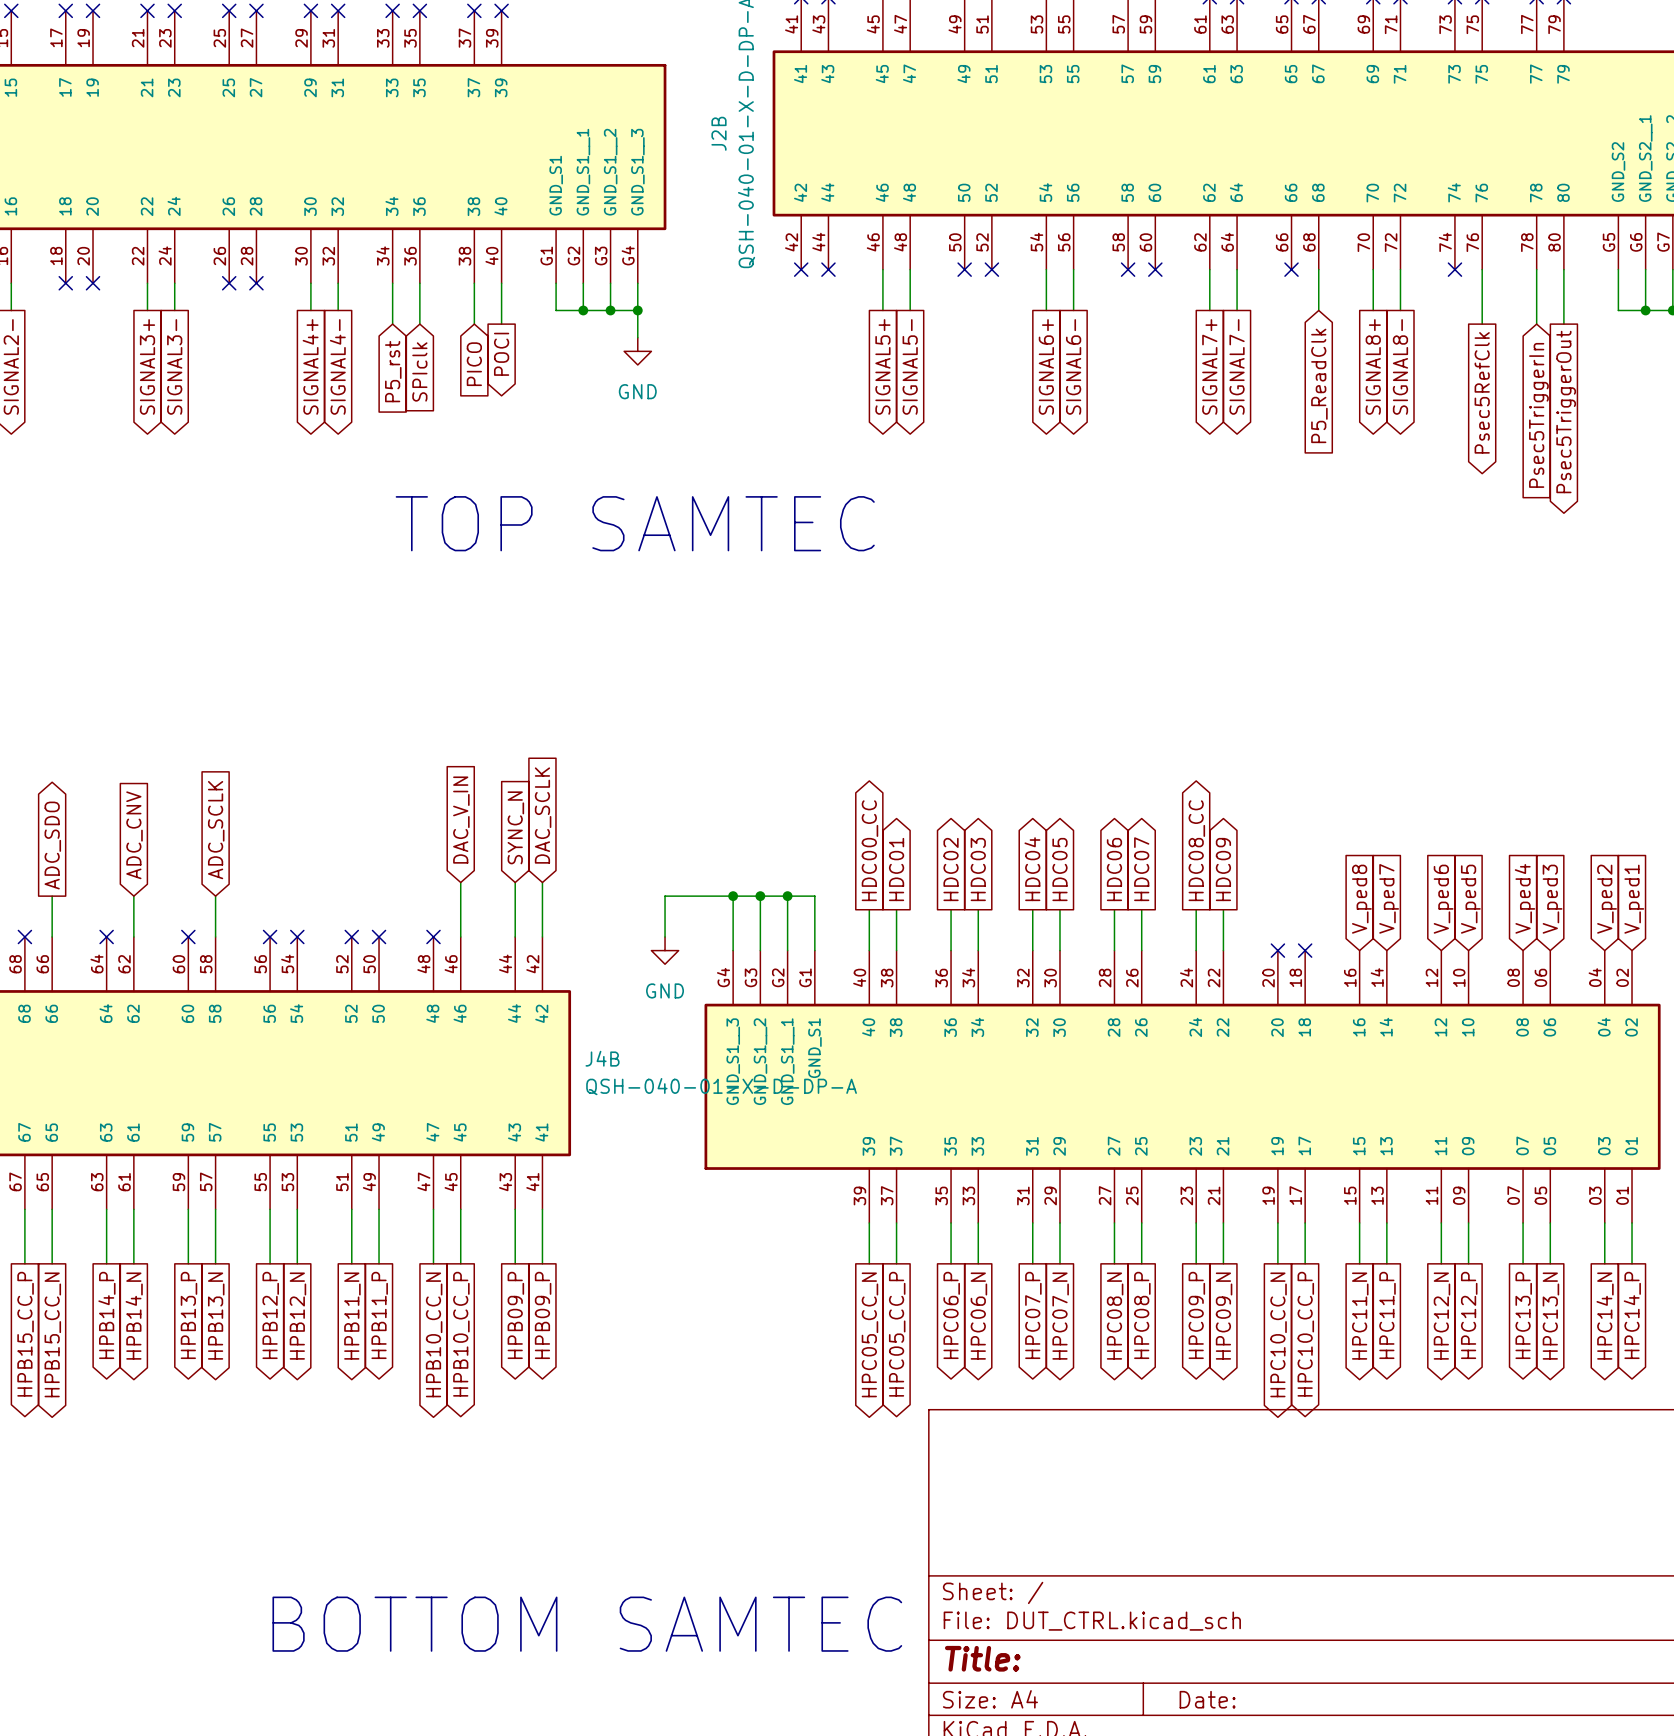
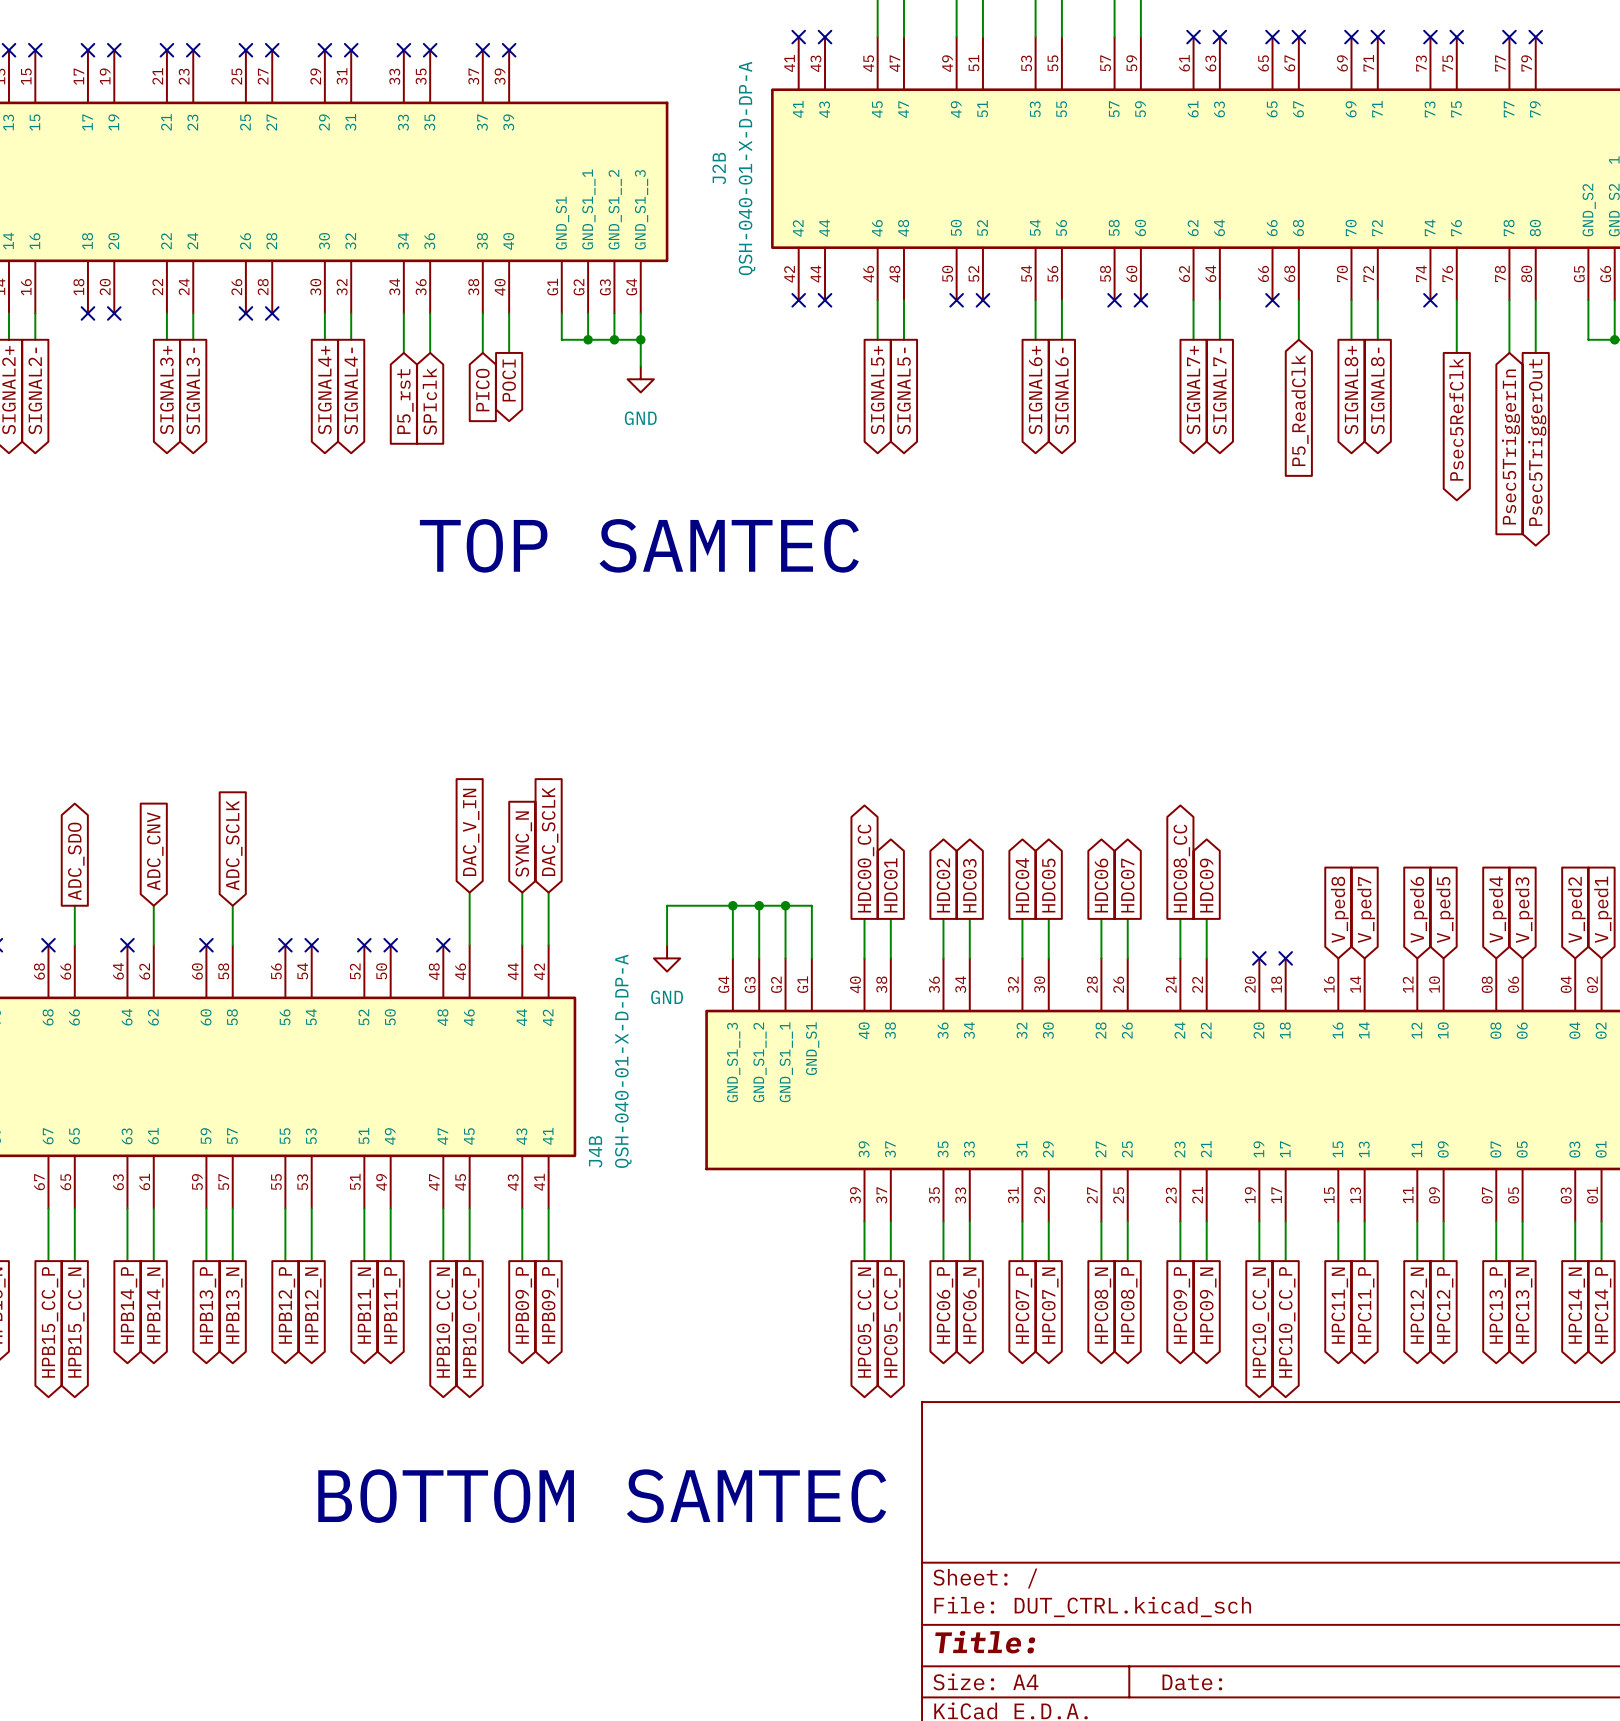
J4B name rotation: 0° (602, 1058) -> 90° counterclockwise (595, 1151)
J4B name position: J4B (602, 1058) -> J4B (595, 1151)
J4B value rotation: 0° (721, 1086) -> 90° counterclockwise (623, 1061)
text position: BOTTOM SAMTEC (587, 1624) -> BOTTOM SAMTEC (602, 1496)

